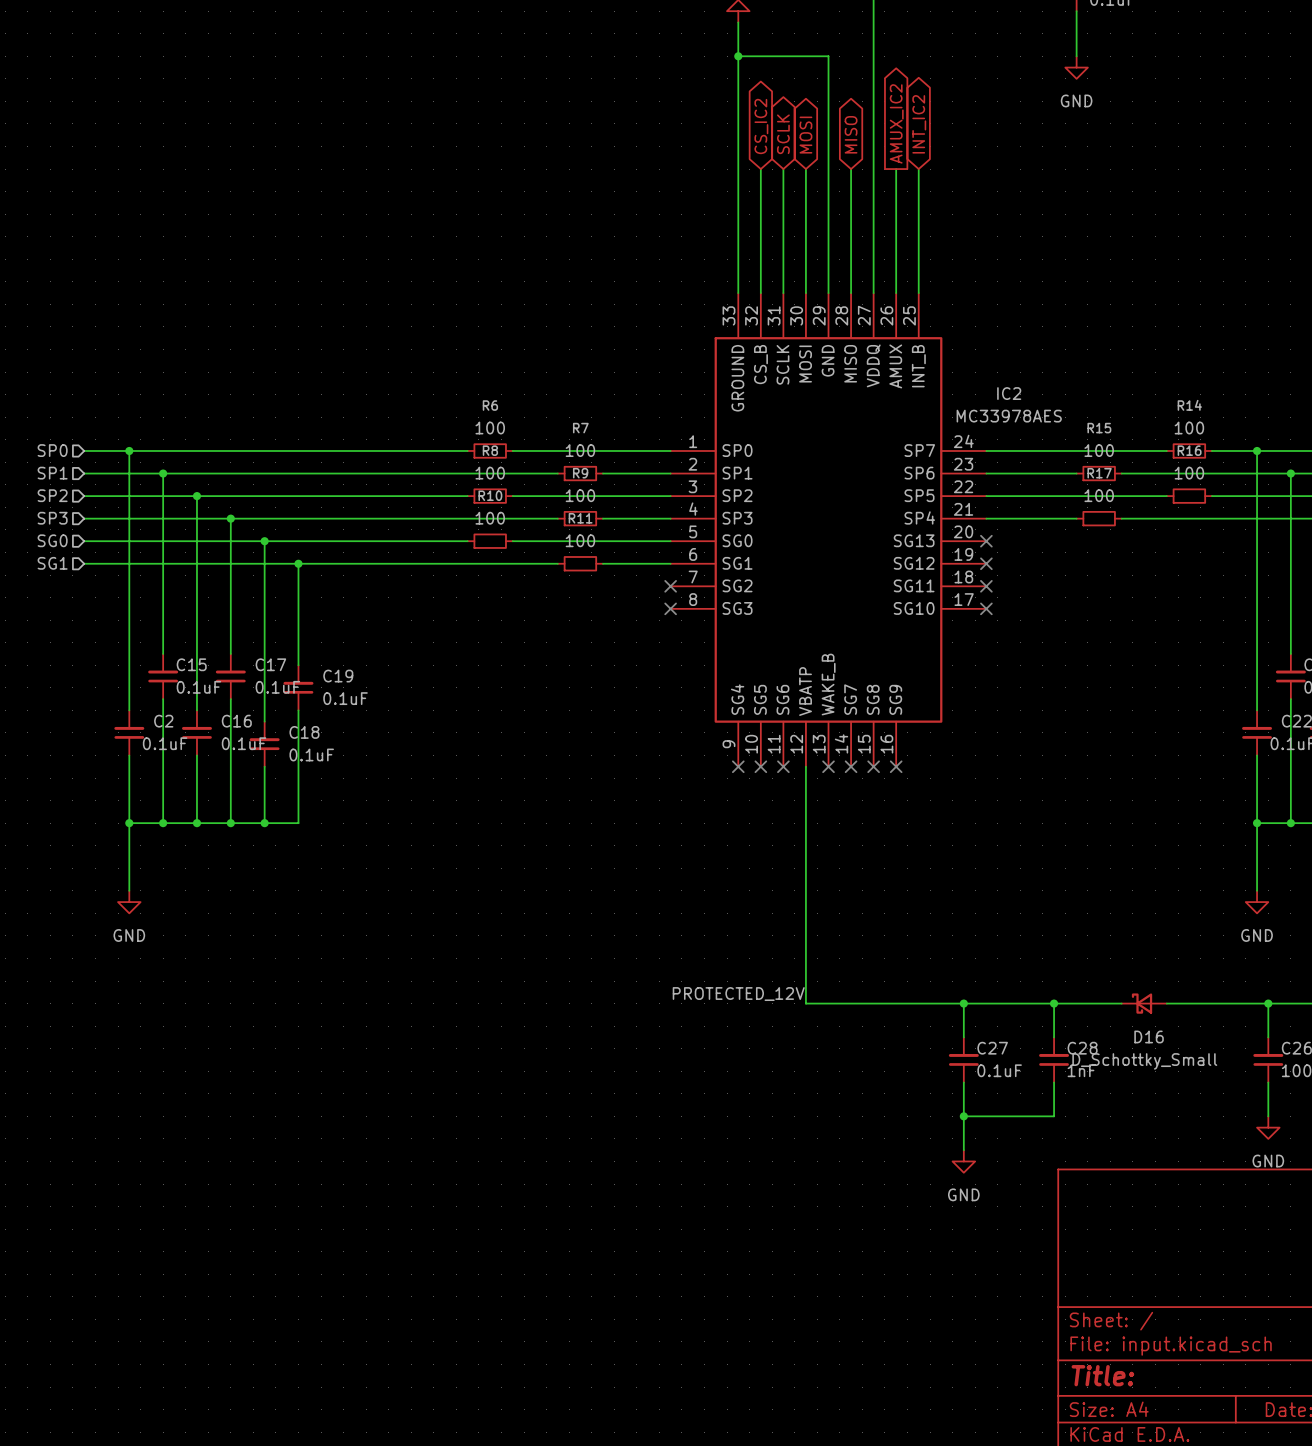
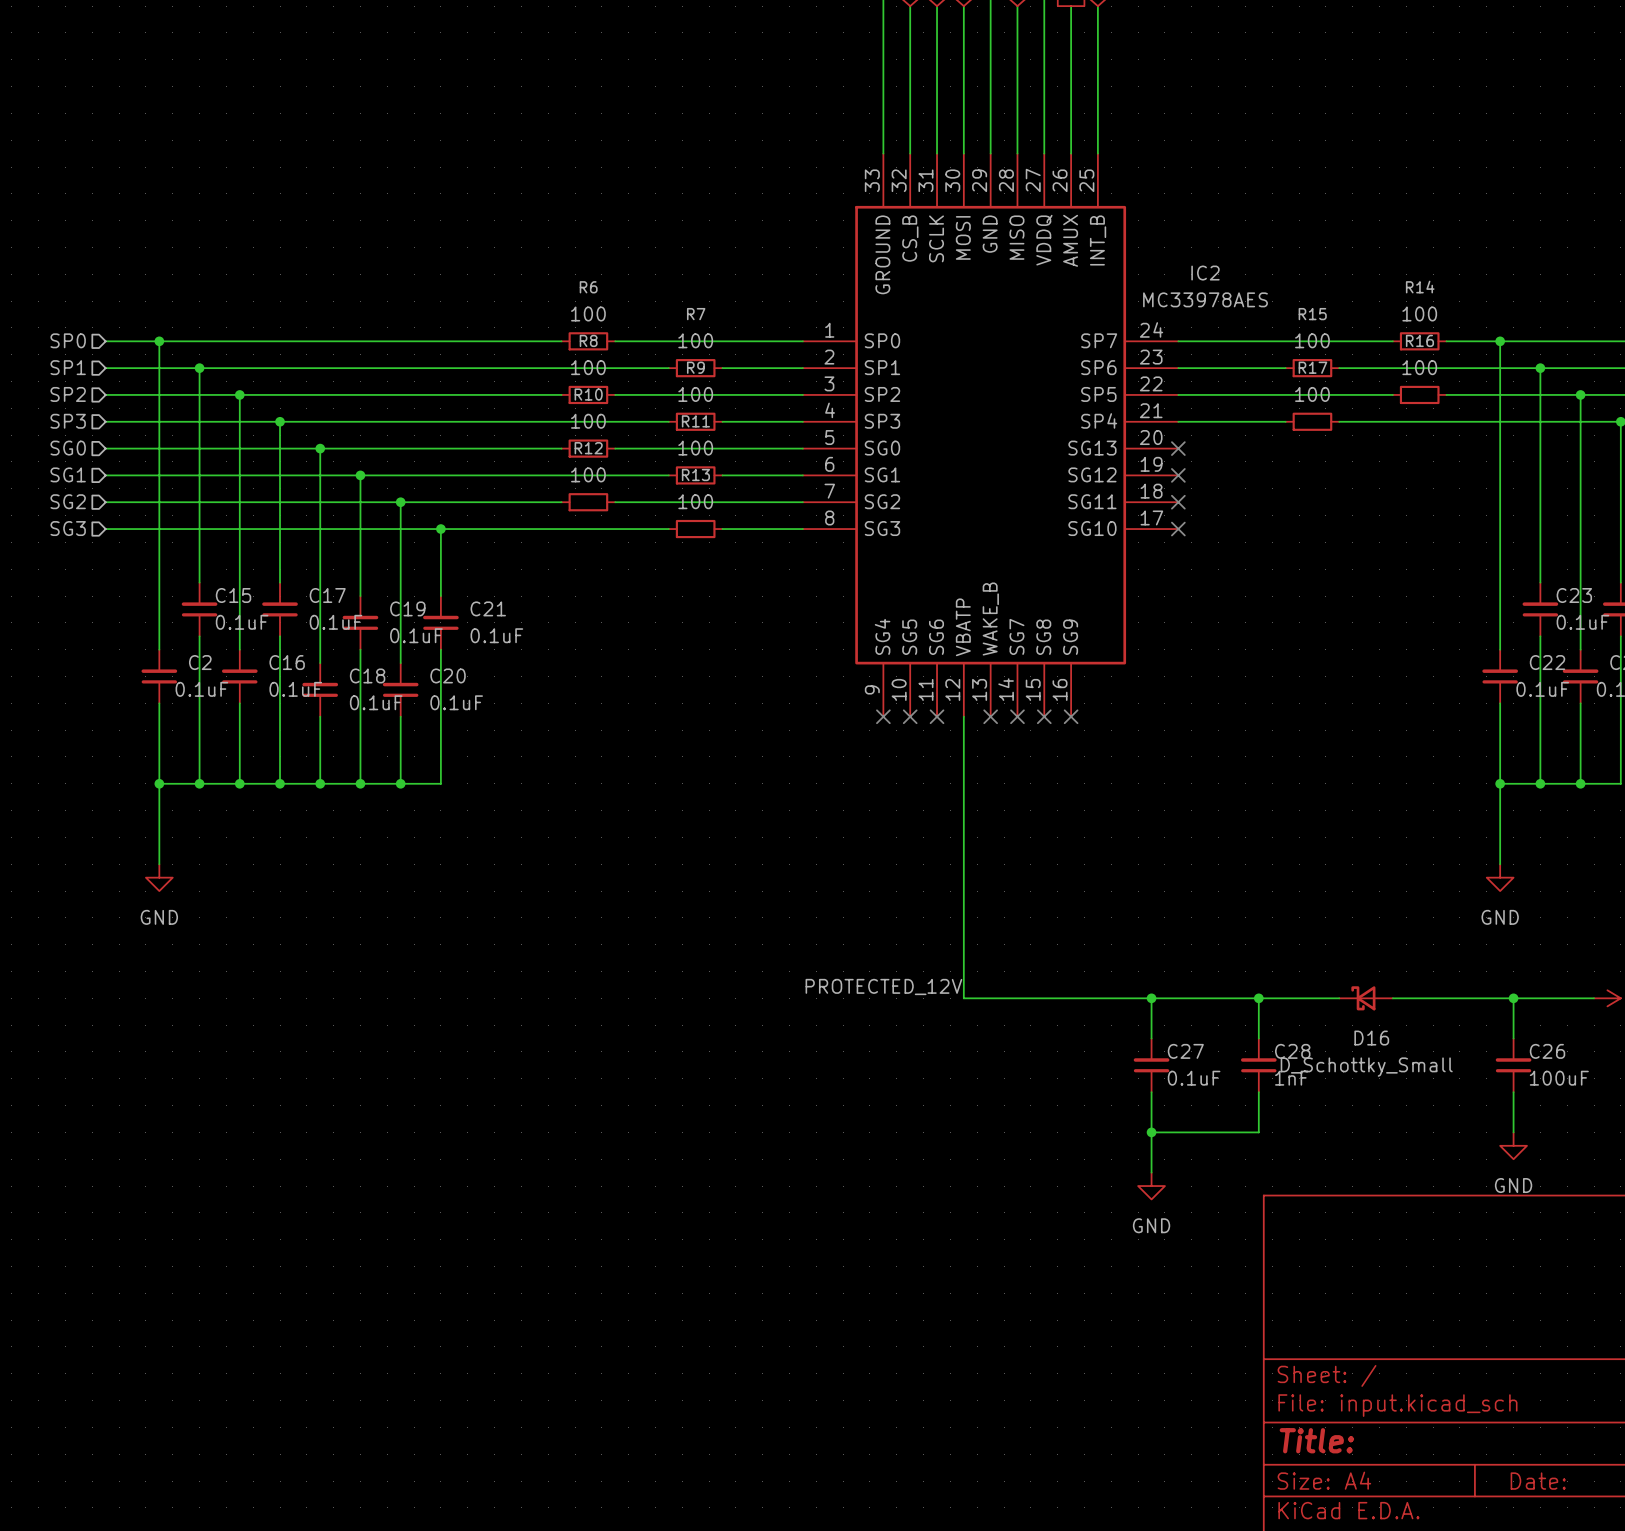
hierarchical label: none -> SG2 (68, 501)
wire: none -> (105, 502) (561, 502)
wire: none -> (400, 502) (400, 663)
junction: none -> (400, 502)
R12: none -> 100 (588, 502)
wire: none -> (615, 502) (802, 502)
no-connect mark: (670, 586) -> none
hierarchical label: none -> SG3 (68, 528)
wire: none -> (105, 529) (668, 529)
wire: none -> (440, 529) (440, 596)
junction: none -> (440, 529)
R13: none -> 100 (695, 529)
wire: none -> (722, 529) (802, 529)
no-connect mark: (670, 608) -> none
C21: none -> 0.1uF (440, 622)
wire: none -> (440, 649) (440, 783) (360, 783)
C20: none -> 0.1uF (400, 689)
wire: none -> (400, 716) (400, 783)
junction: none -> (360, 783)
junction: none -> (400, 783)

